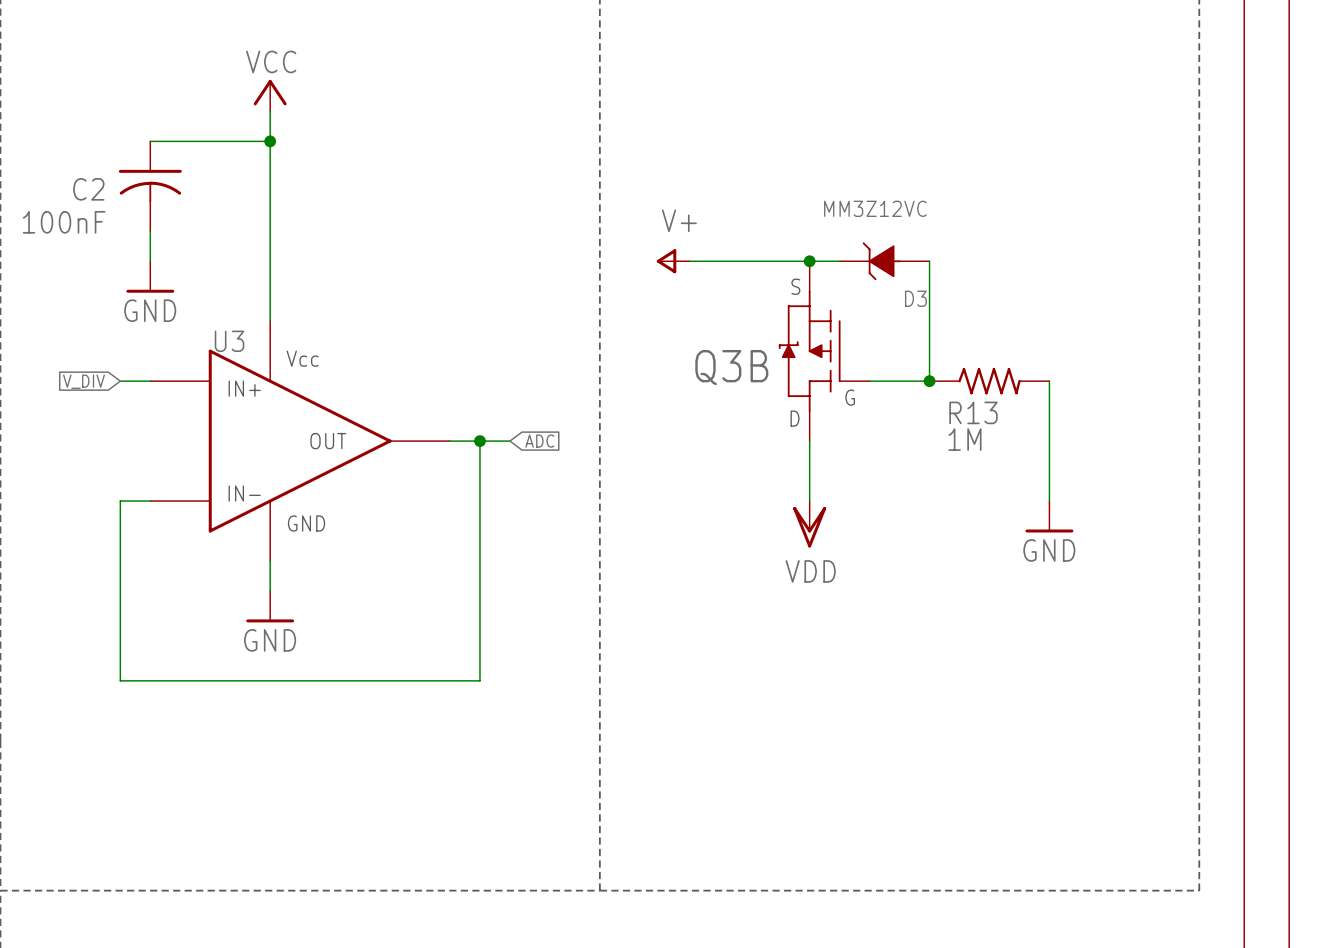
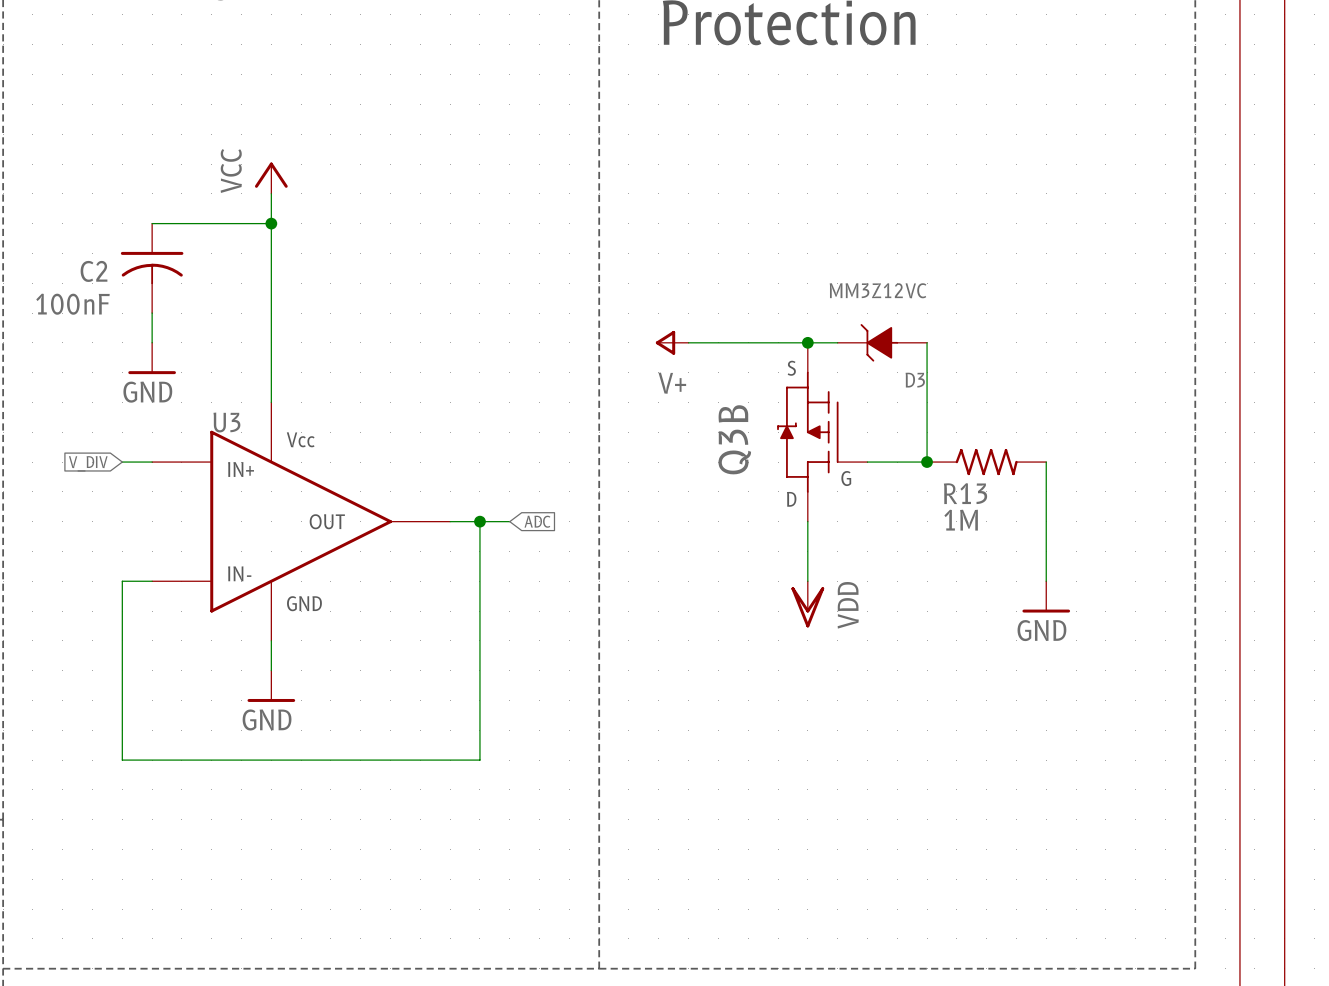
power symbol text rotation: 0° (271, 61) -> 90° counterclockwise (231, 171)
power symbol text position: V+ (679, 220) -> V+ (672, 383)
Q3B name rotation: 0° (731, 367) -> 90° counterclockwise (734, 439)
power symbol text rotation: 0° (810, 571) -> 90° counterclockwise (848, 605)

